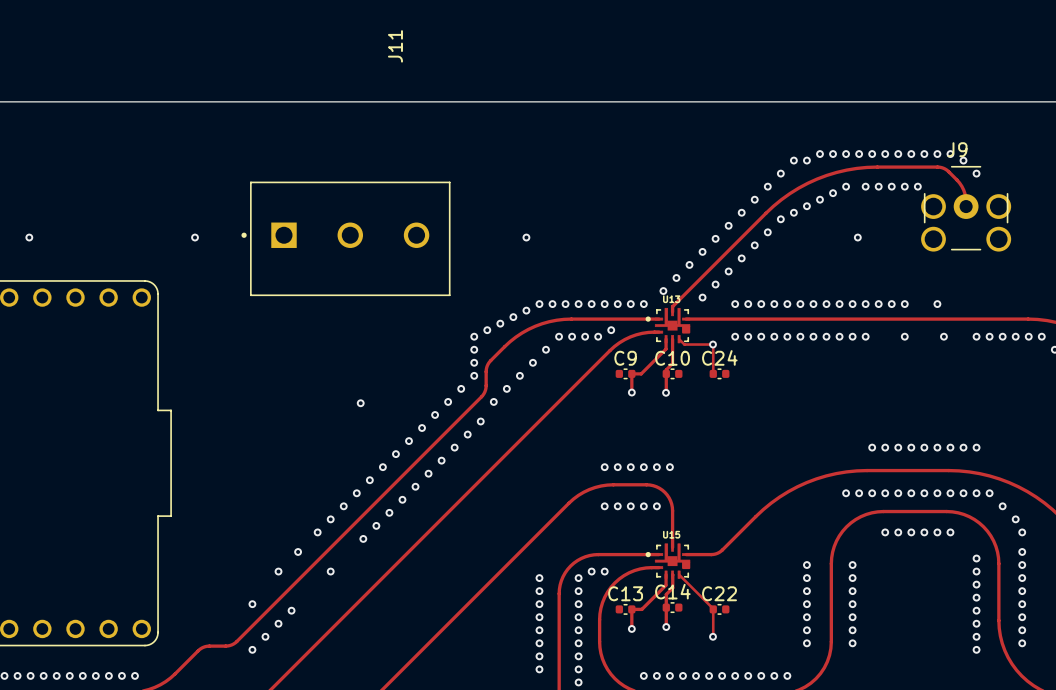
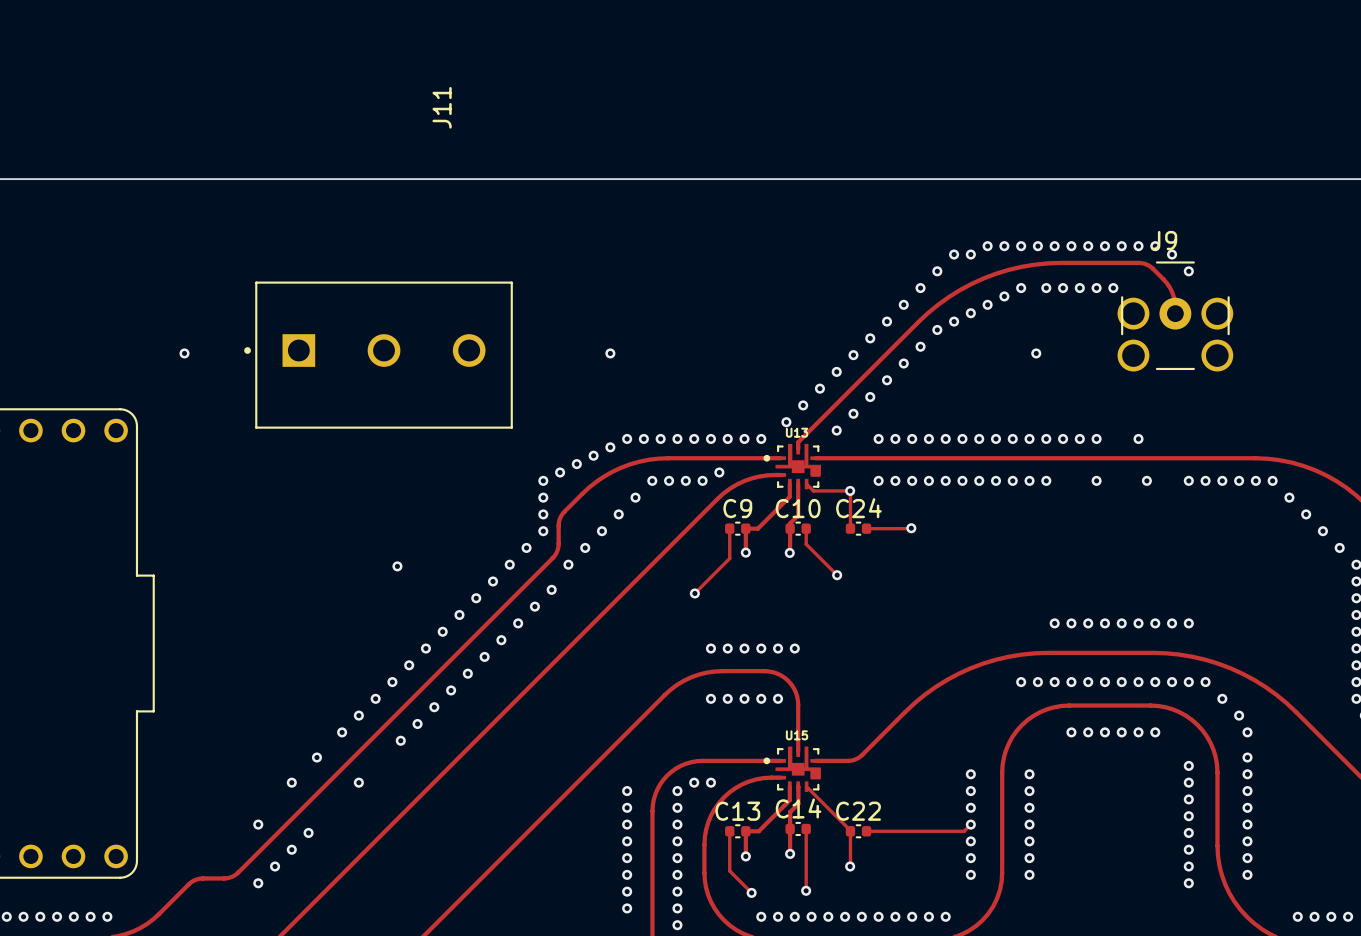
track: none -> (729, 528) (729, 558) (694, 593)
track: none -> (806, 528) (806, 544) (837, 575)
track: none -> (911, 528) (866, 528)
via: none -> (911, 528)
via: none -> (837, 575)
via: none -> (694, 593)
track: none -> (970, 824) (964, 831) (866, 831)
track: none -> (806, 828) (806, 890)
track: none -> (729, 831) (729, 871) (751, 892)
via: none -> (806, 890)
via: none -> (751, 892)

